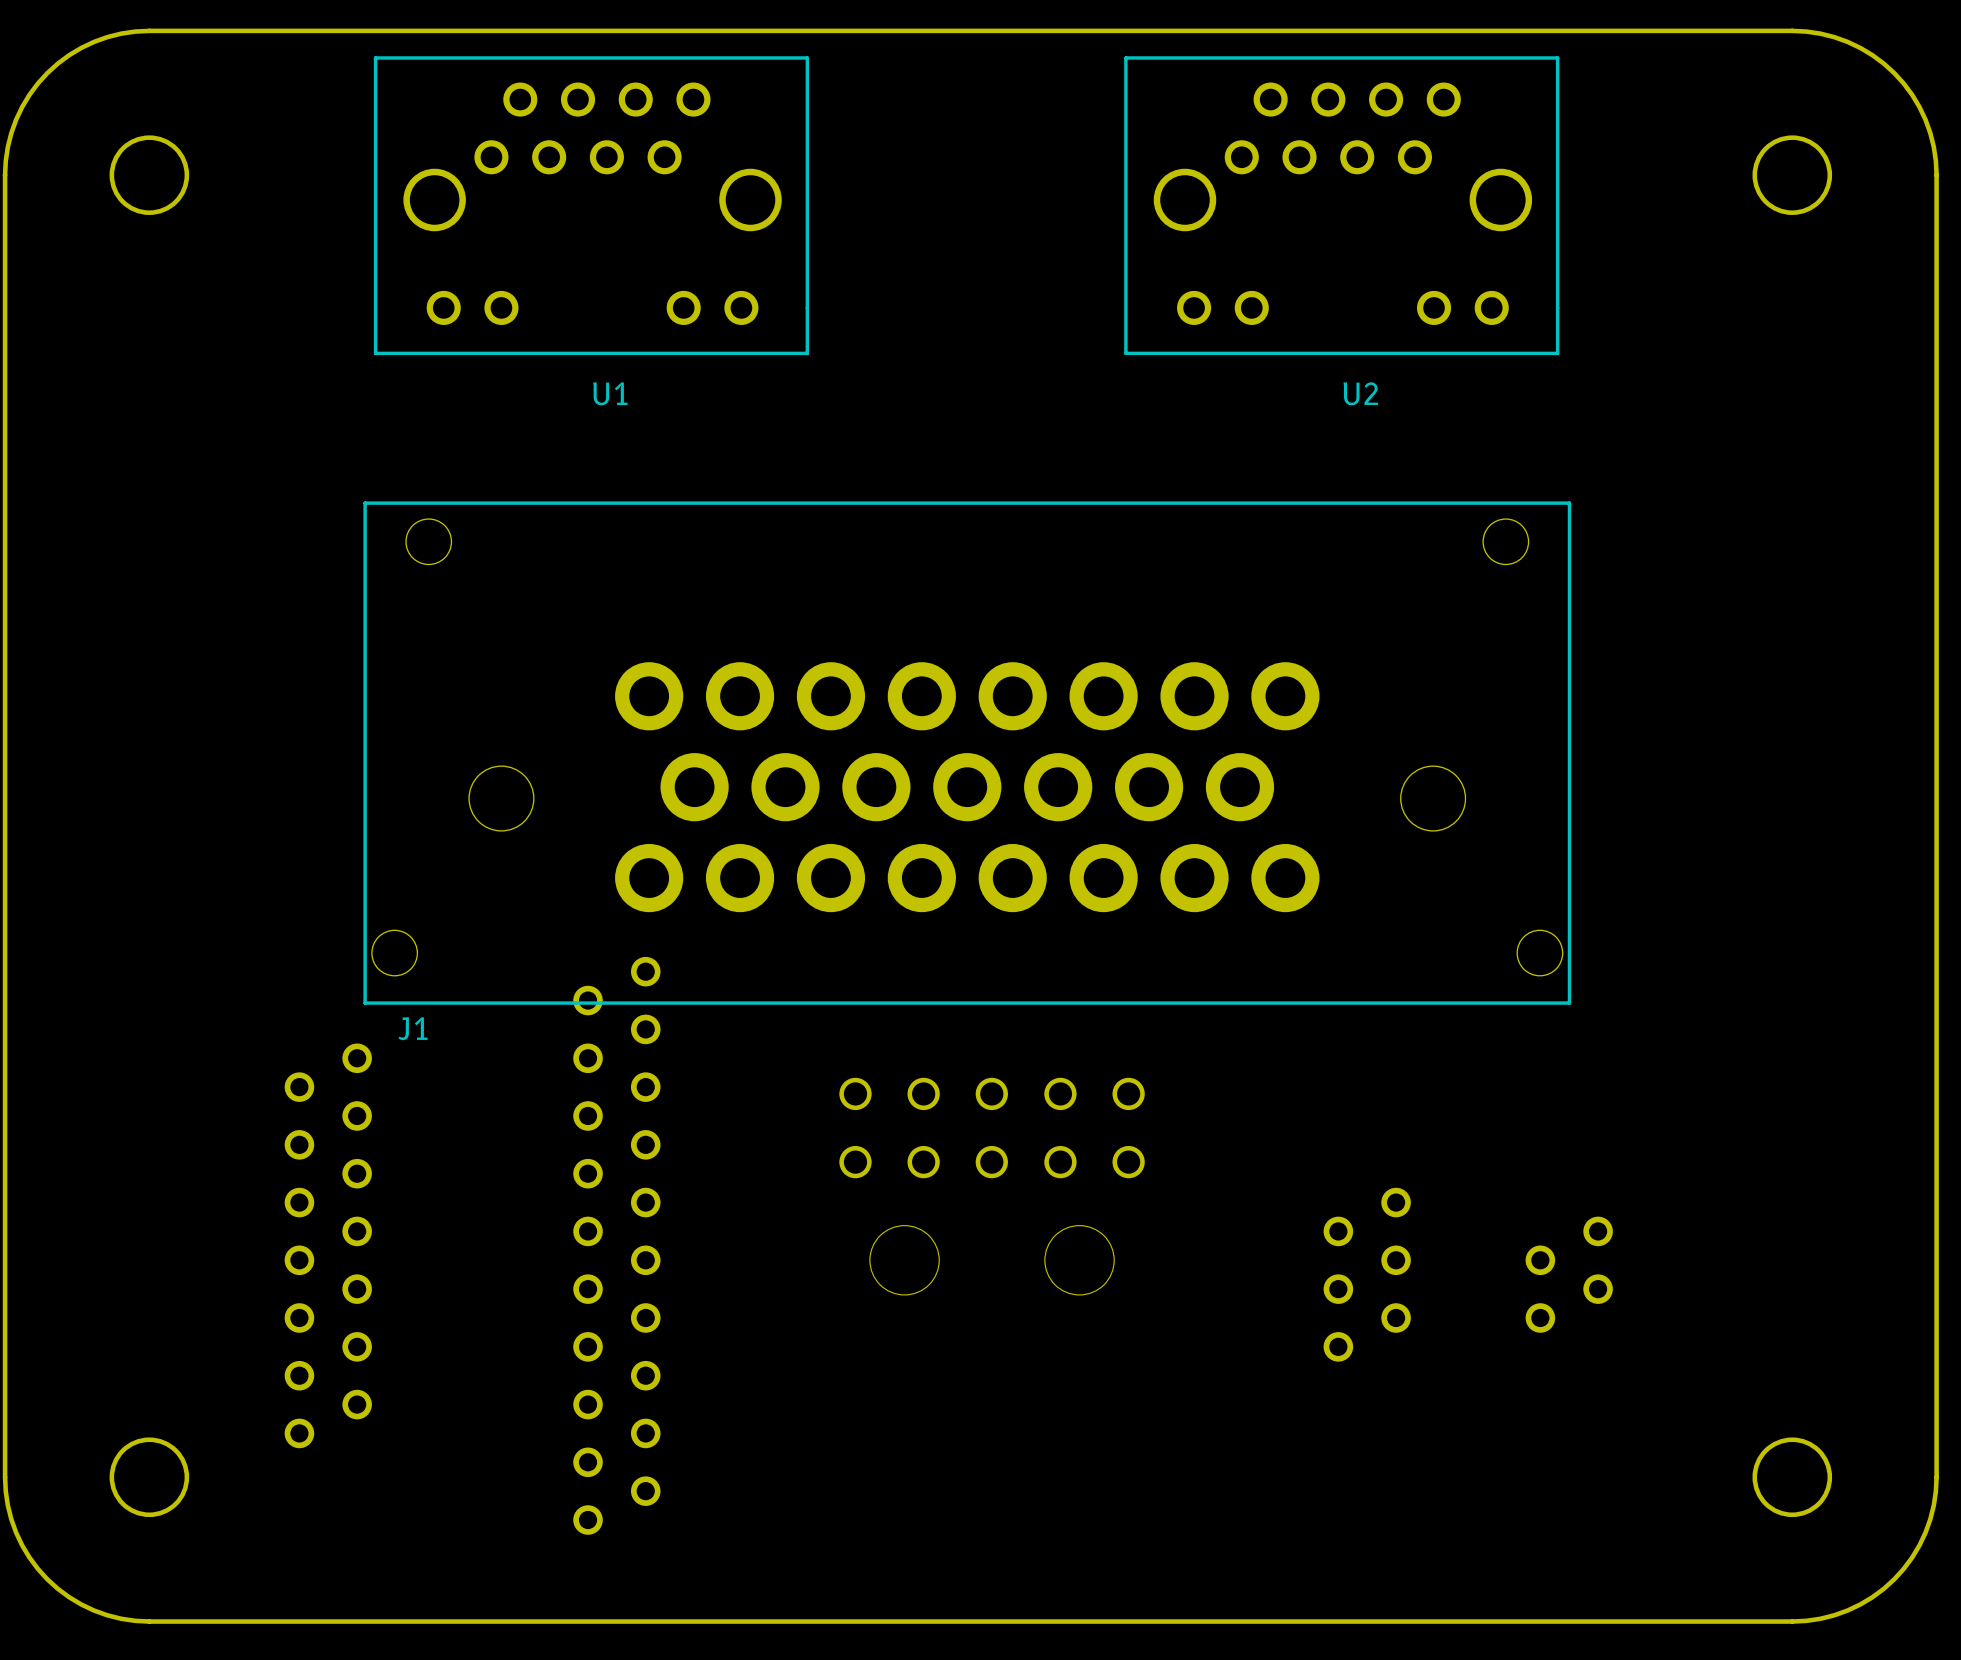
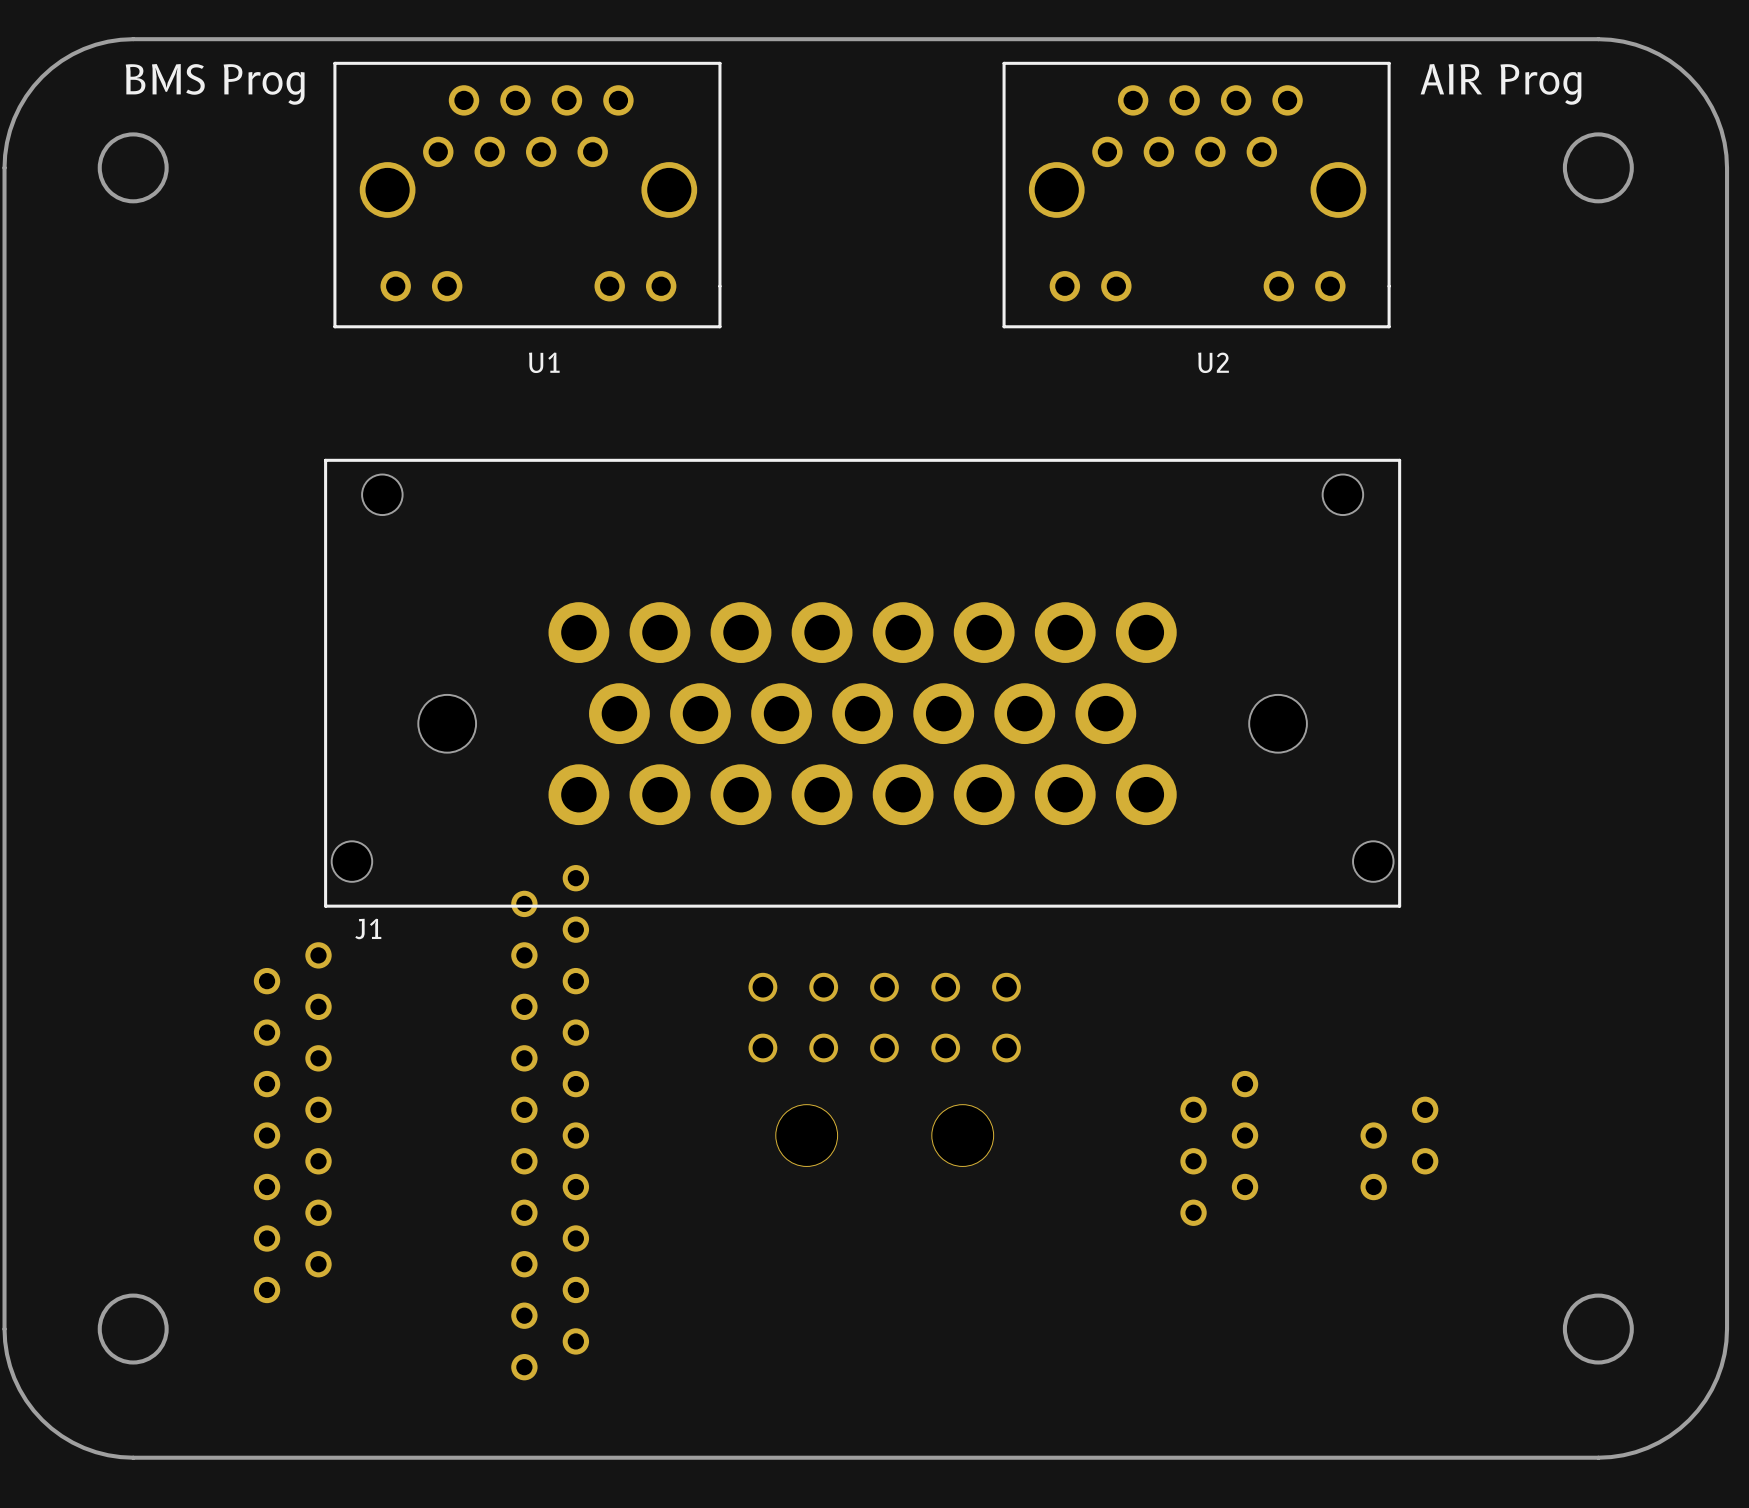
text: none -> BMS Prog (215, 84)
text: none -> AIR Prog (1501, 84)

